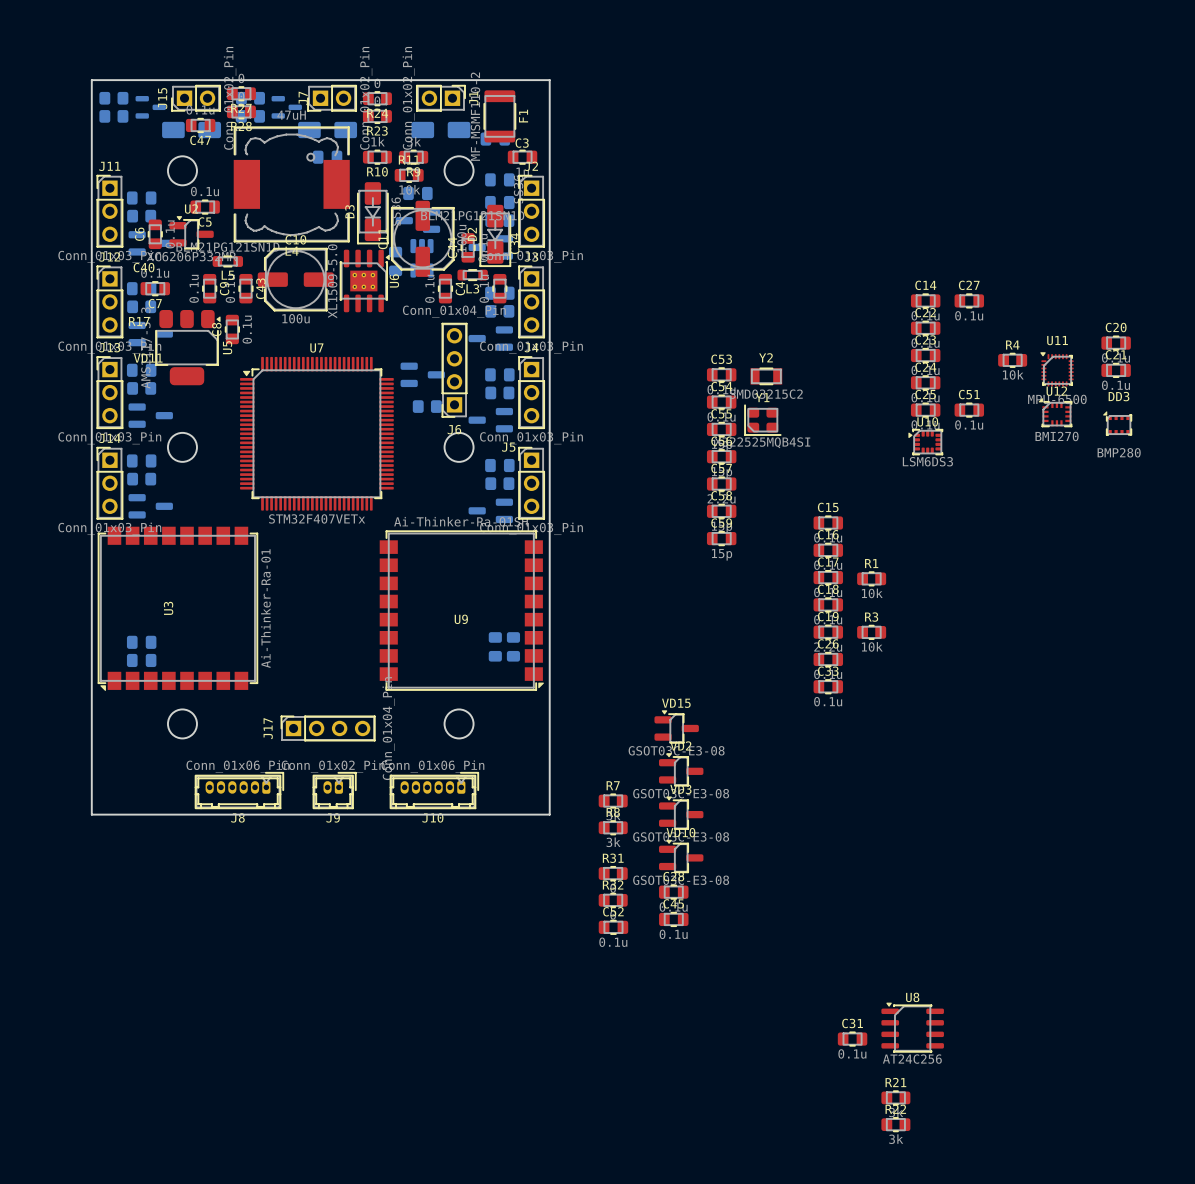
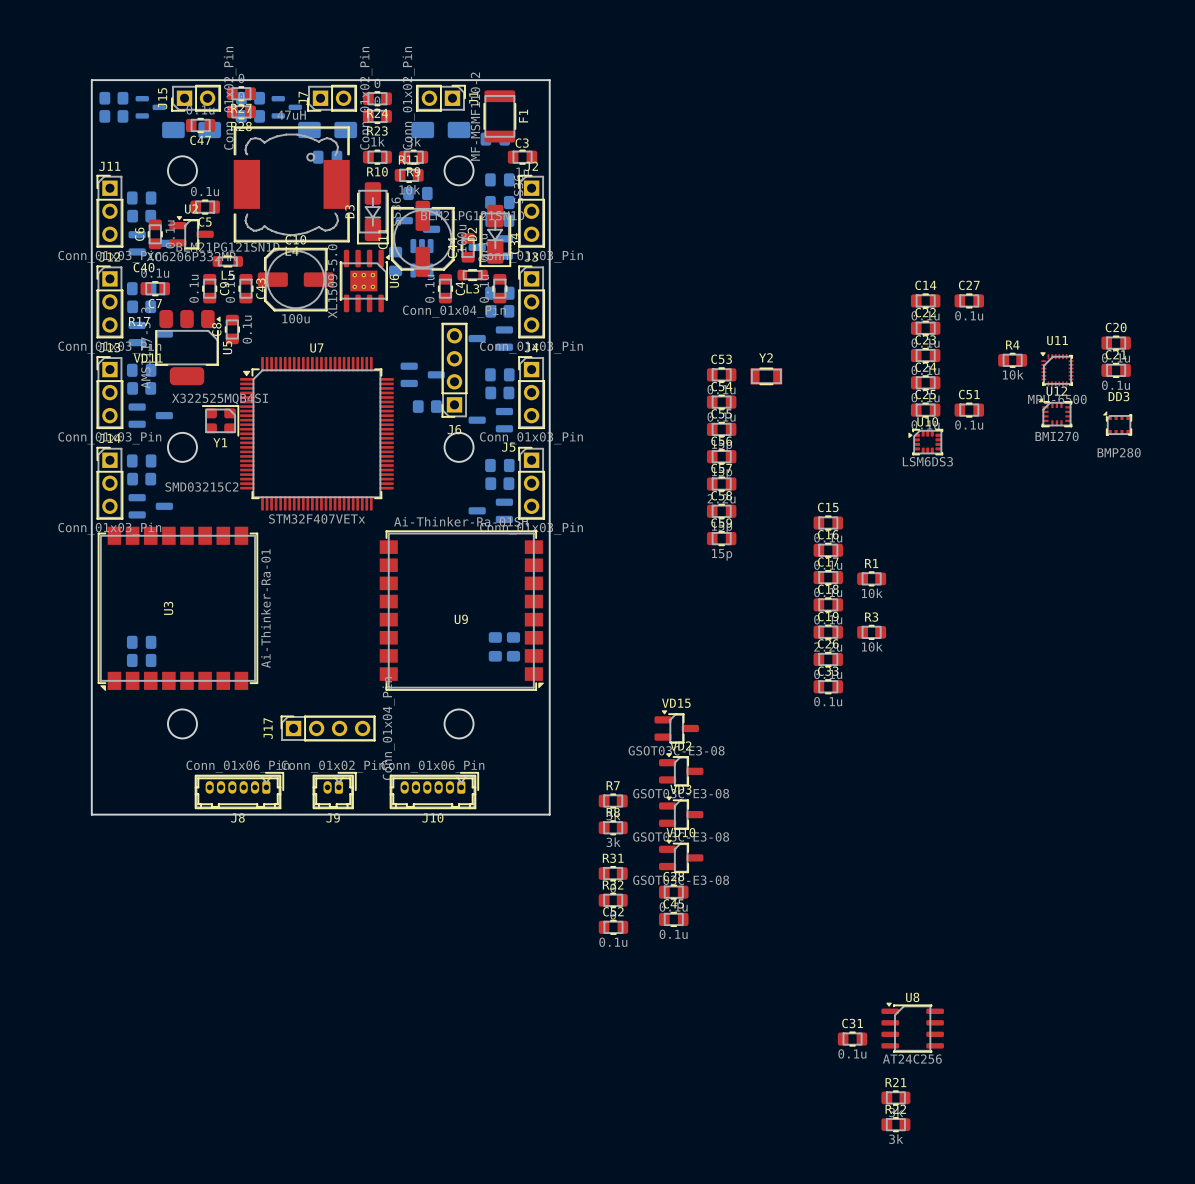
Y2 value position: SMD03215C2 (766, 394) -> SMD03215C2 (201, 486)
Y1 rotation: 0° (762, 420) -> 180° (220, 420)
Y1 position: (762, 420) -> (220, 420)

